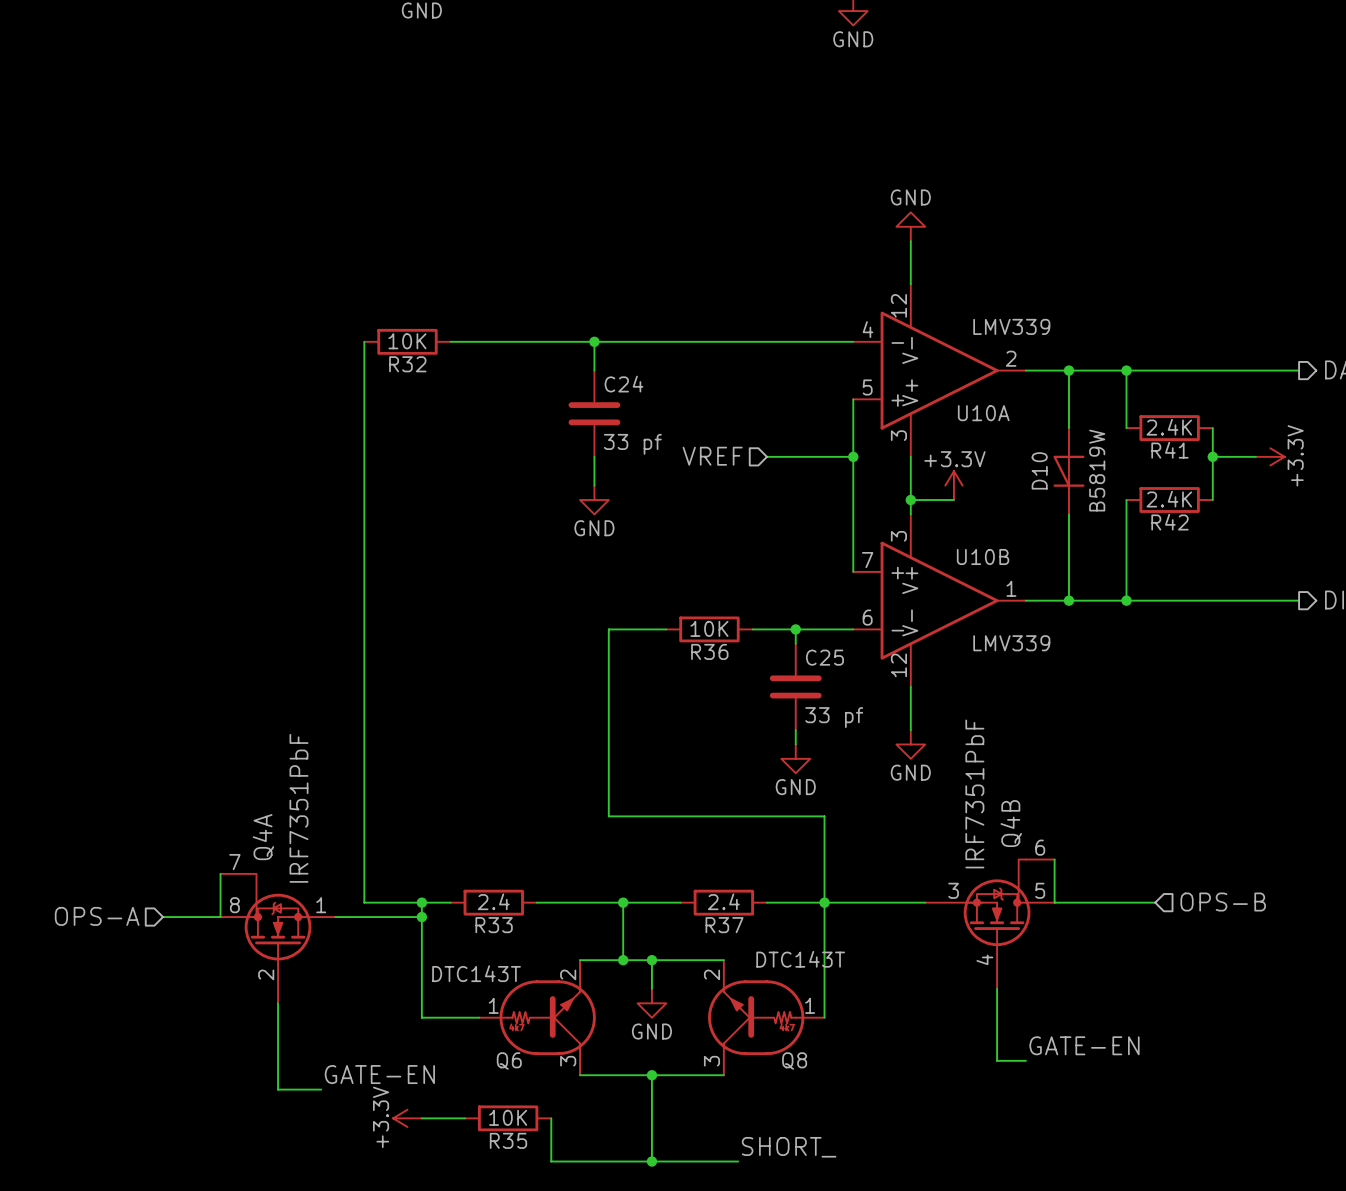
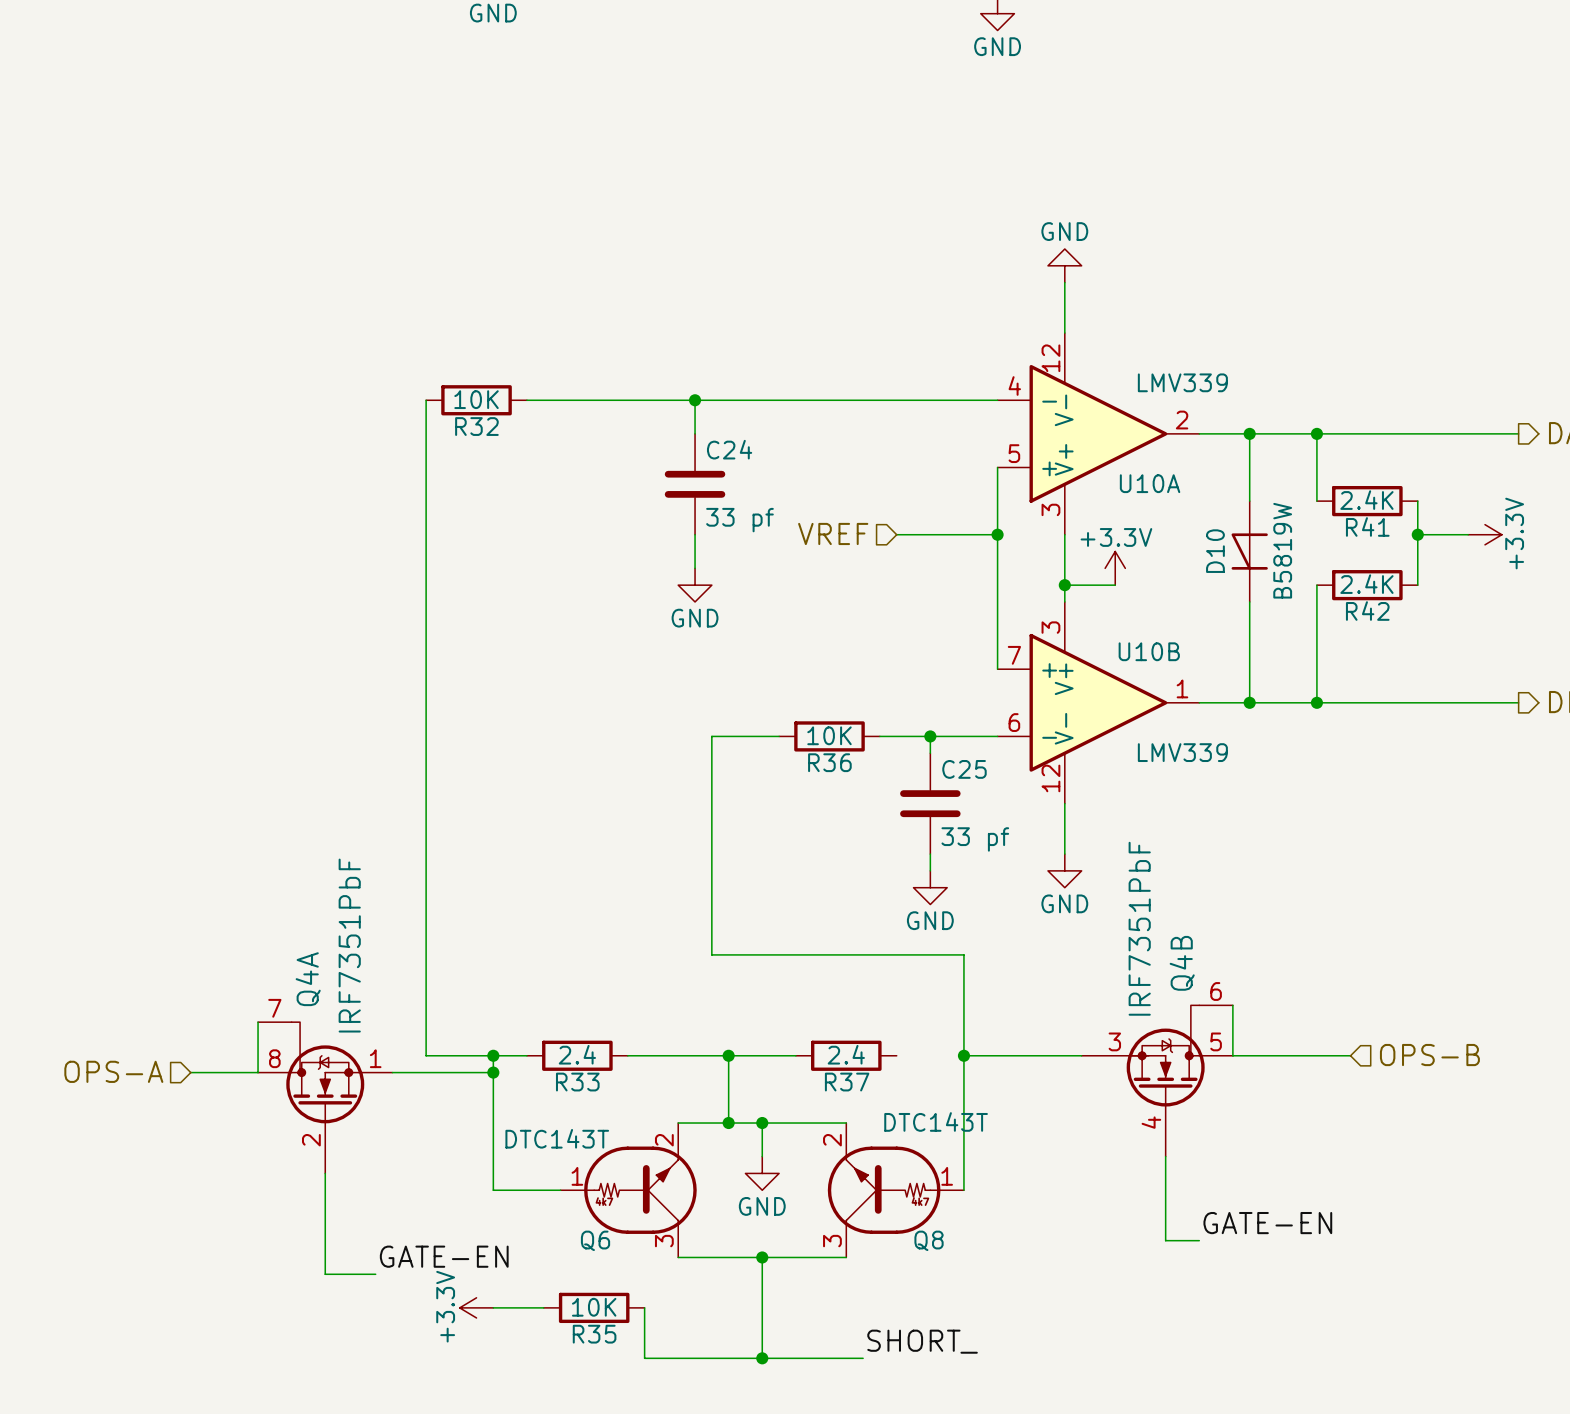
wire: (766, 902) (824, 902) -> none

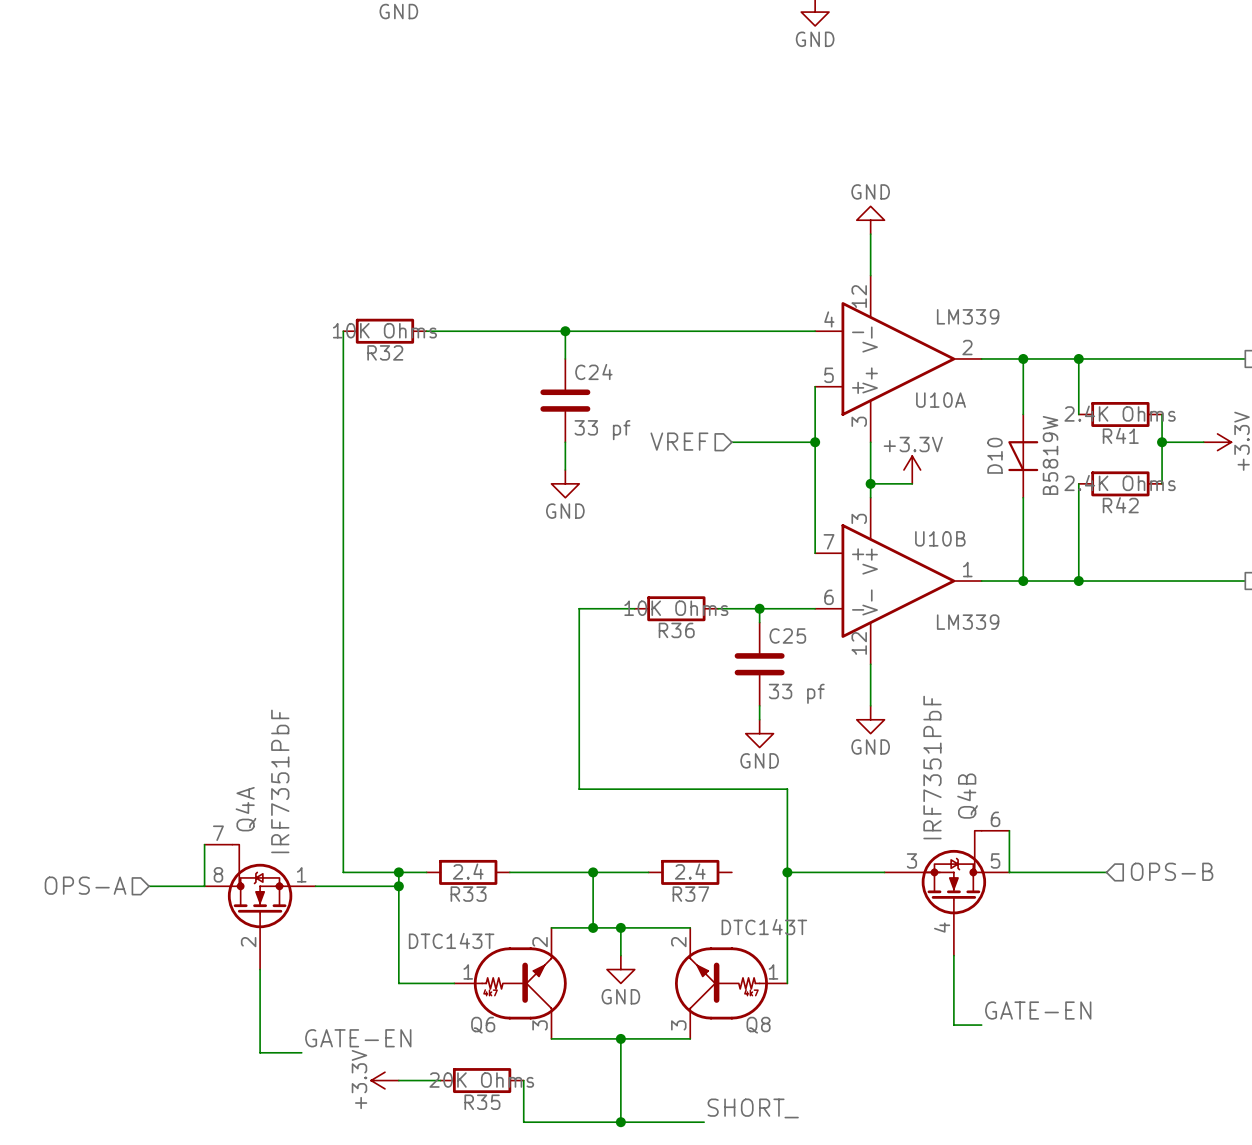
U10A value: LMV339 (1182, 382) -> LM339 (968, 316)
R32 value: 10K (476, 399) -> 10K Ohms (384, 330)
R41 value: 2.4K (1366, 500) -> 2.4K Ohms (1120, 413)
R42 value: 2.4K (1366, 584) -> 2.4K Ohms (1120, 483)
R36 value: 10K (829, 735) -> 10K Ohms (676, 608)
U10B value: LMV339 (1182, 752) -> LM339 (968, 622)
R35 value: 10K (594, 1307) -> 20K Ohms (481, 1080)

